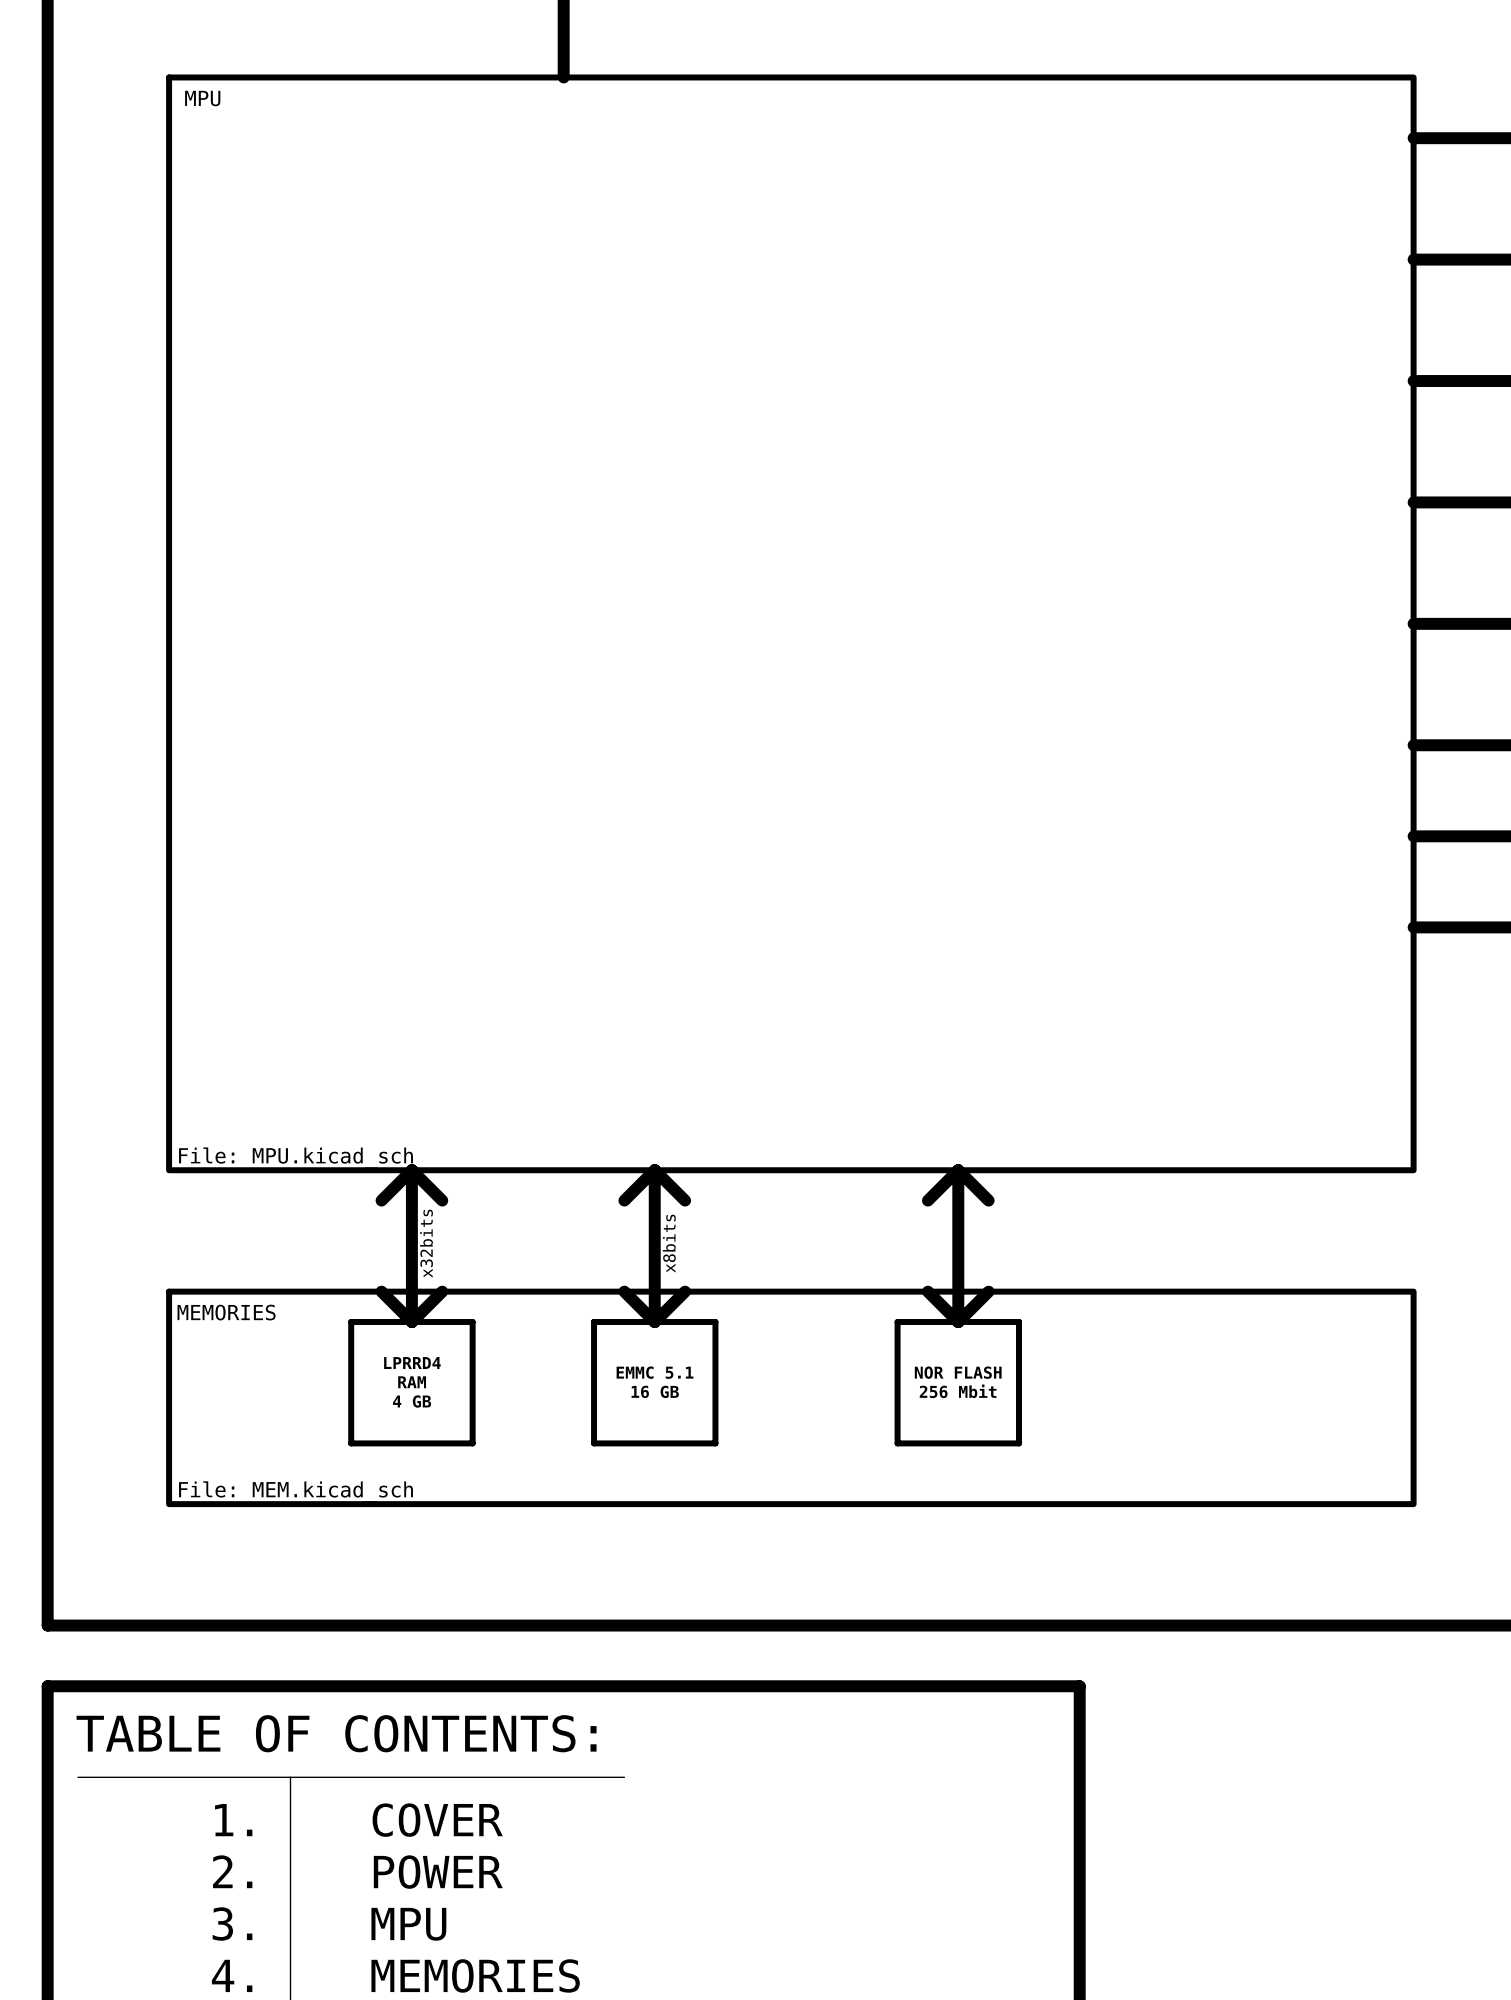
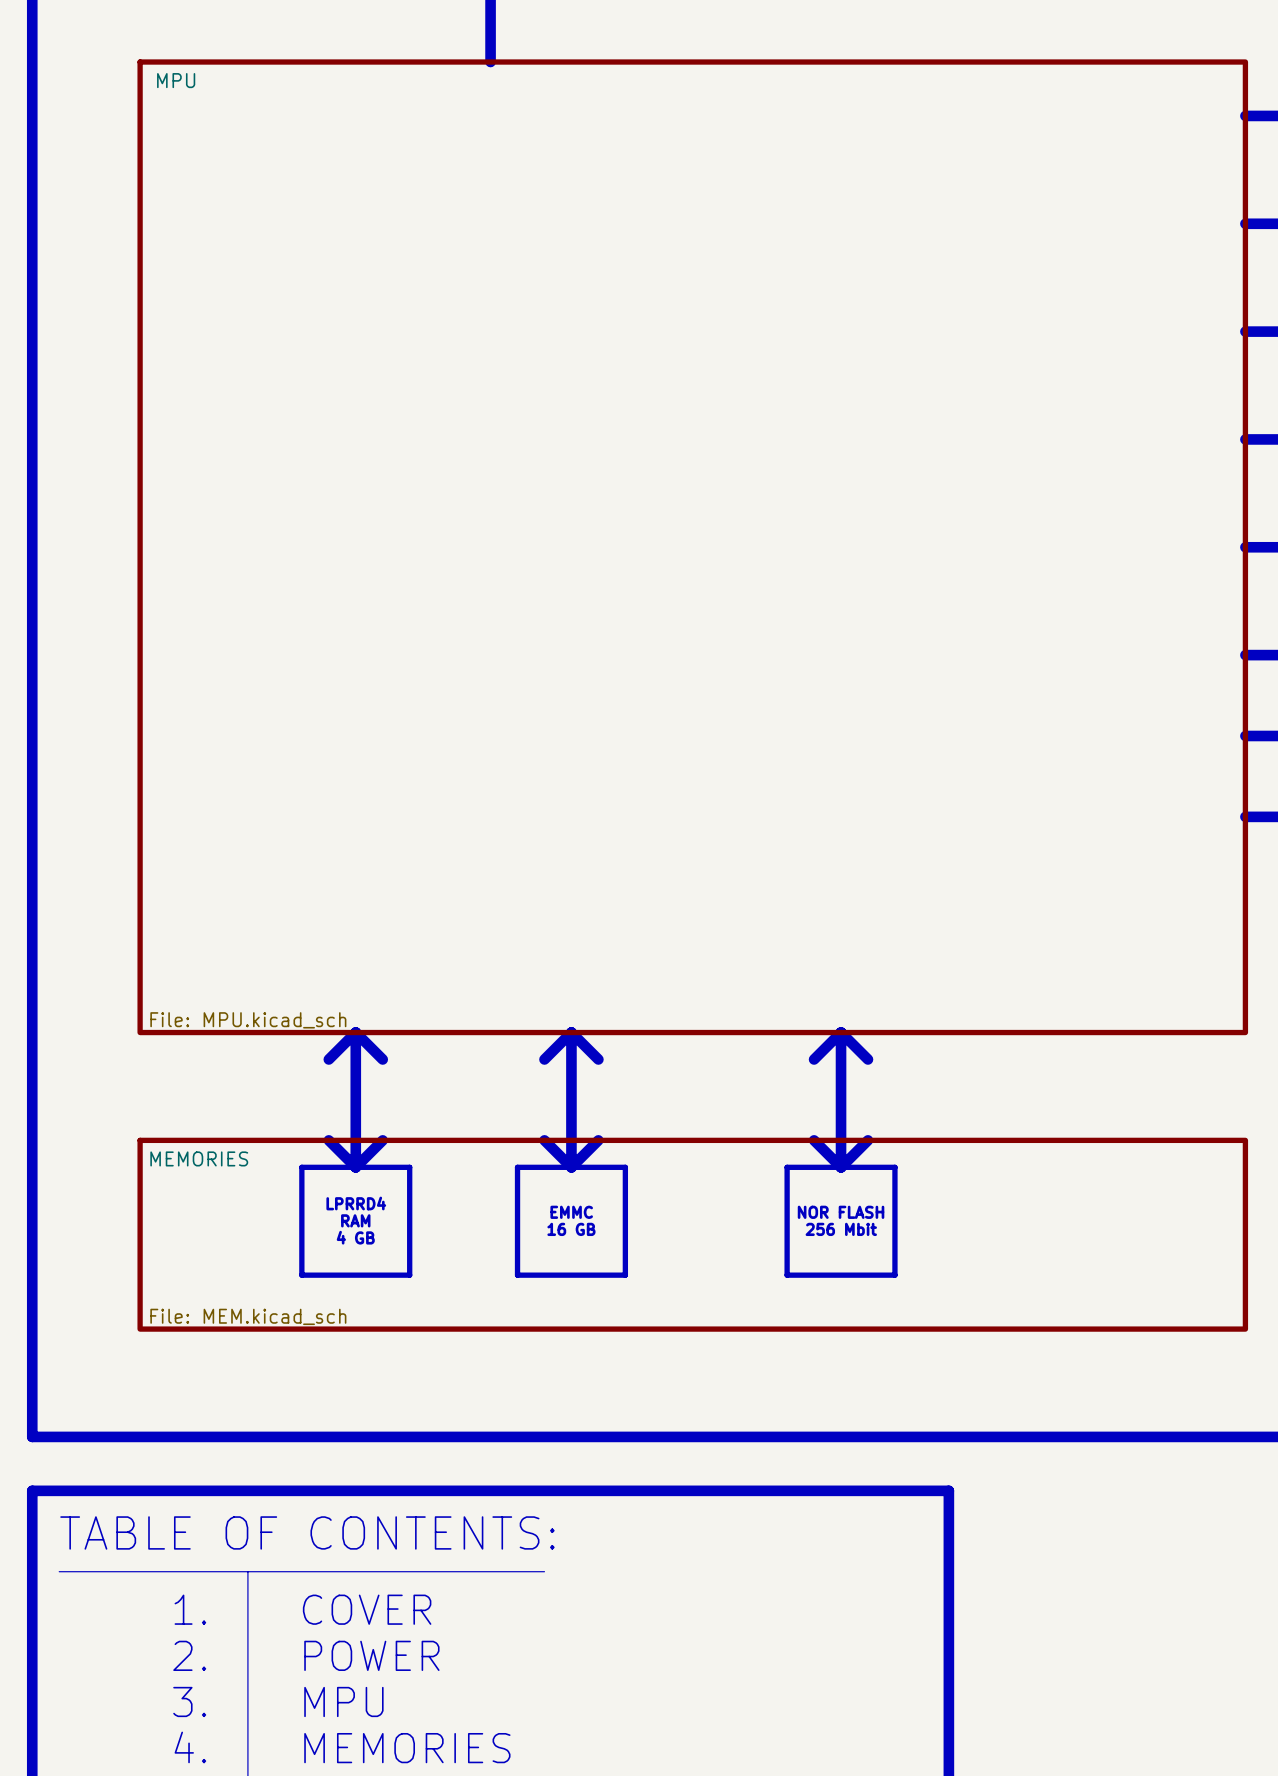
text: x32bits (426, 1243) -> none
text: x8bits (669, 1243) -> none
text: EMMC 5.1 (655, 1372) -> EMMC (571, 1212)

